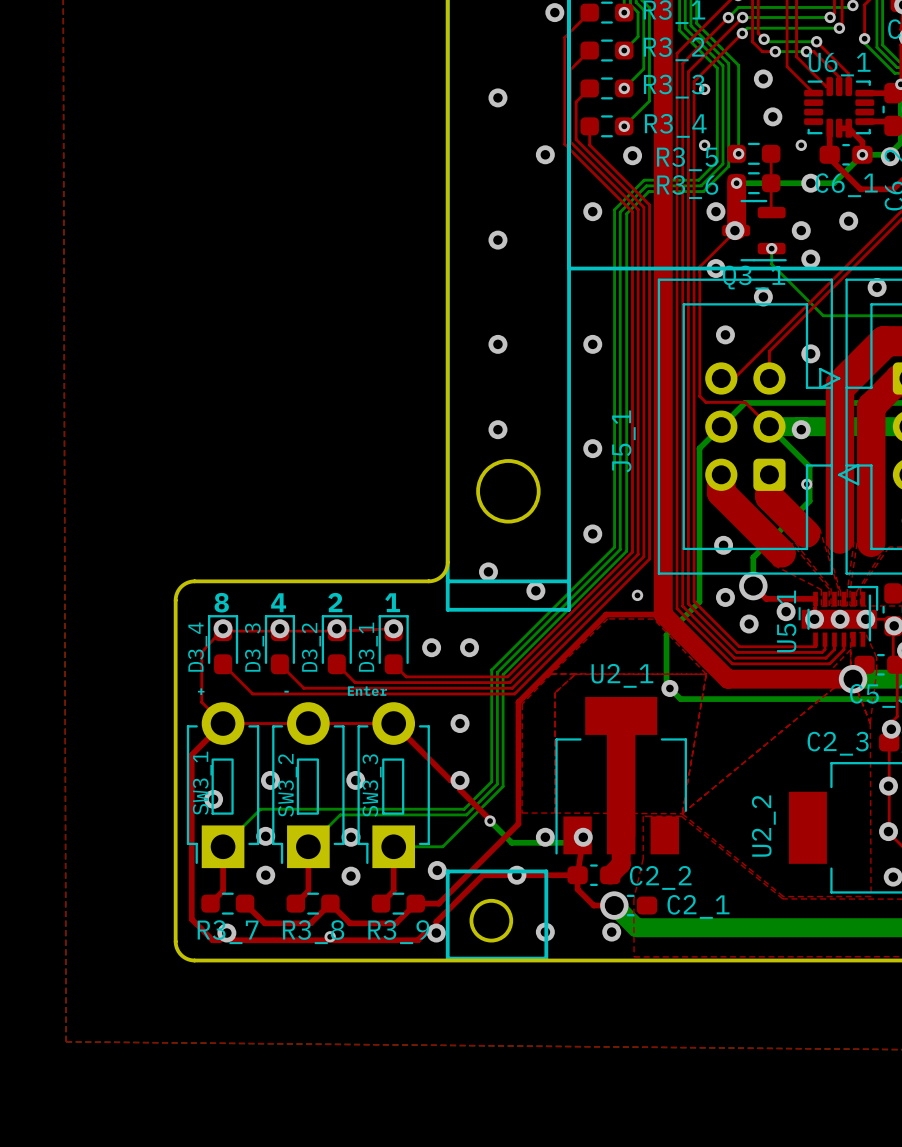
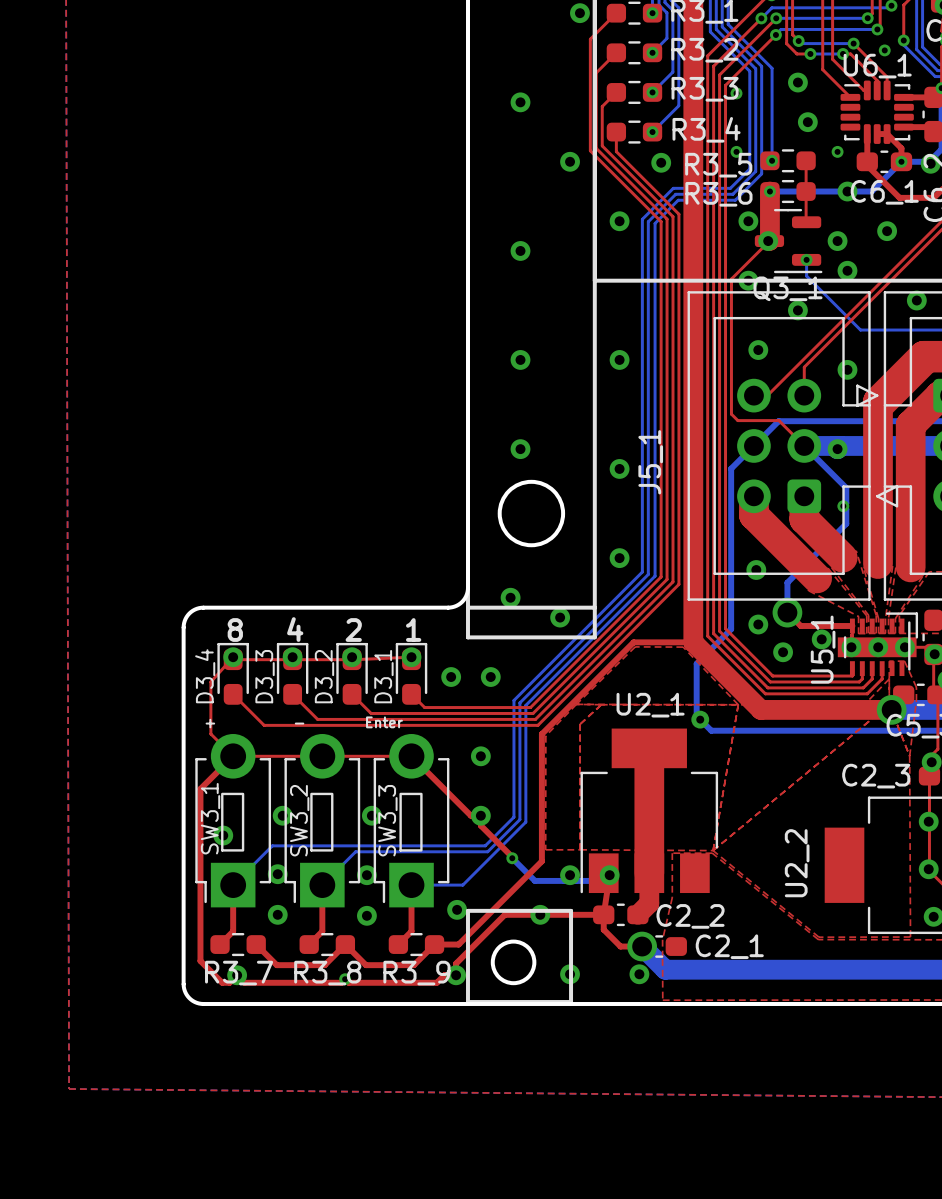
via: none -> (884, 50)
via: (637, 595) -> none

